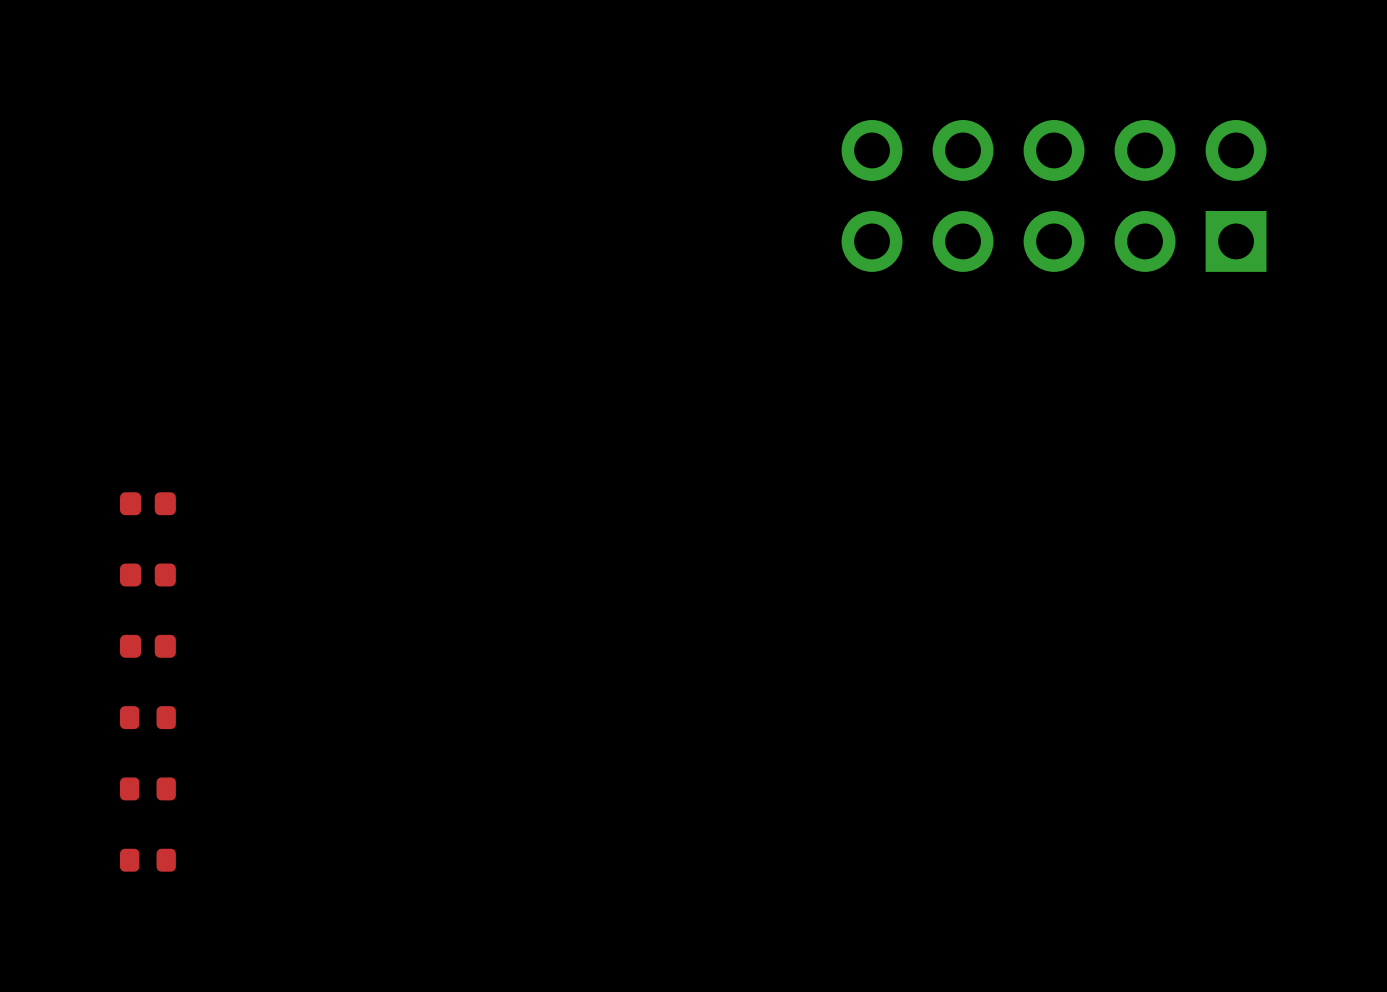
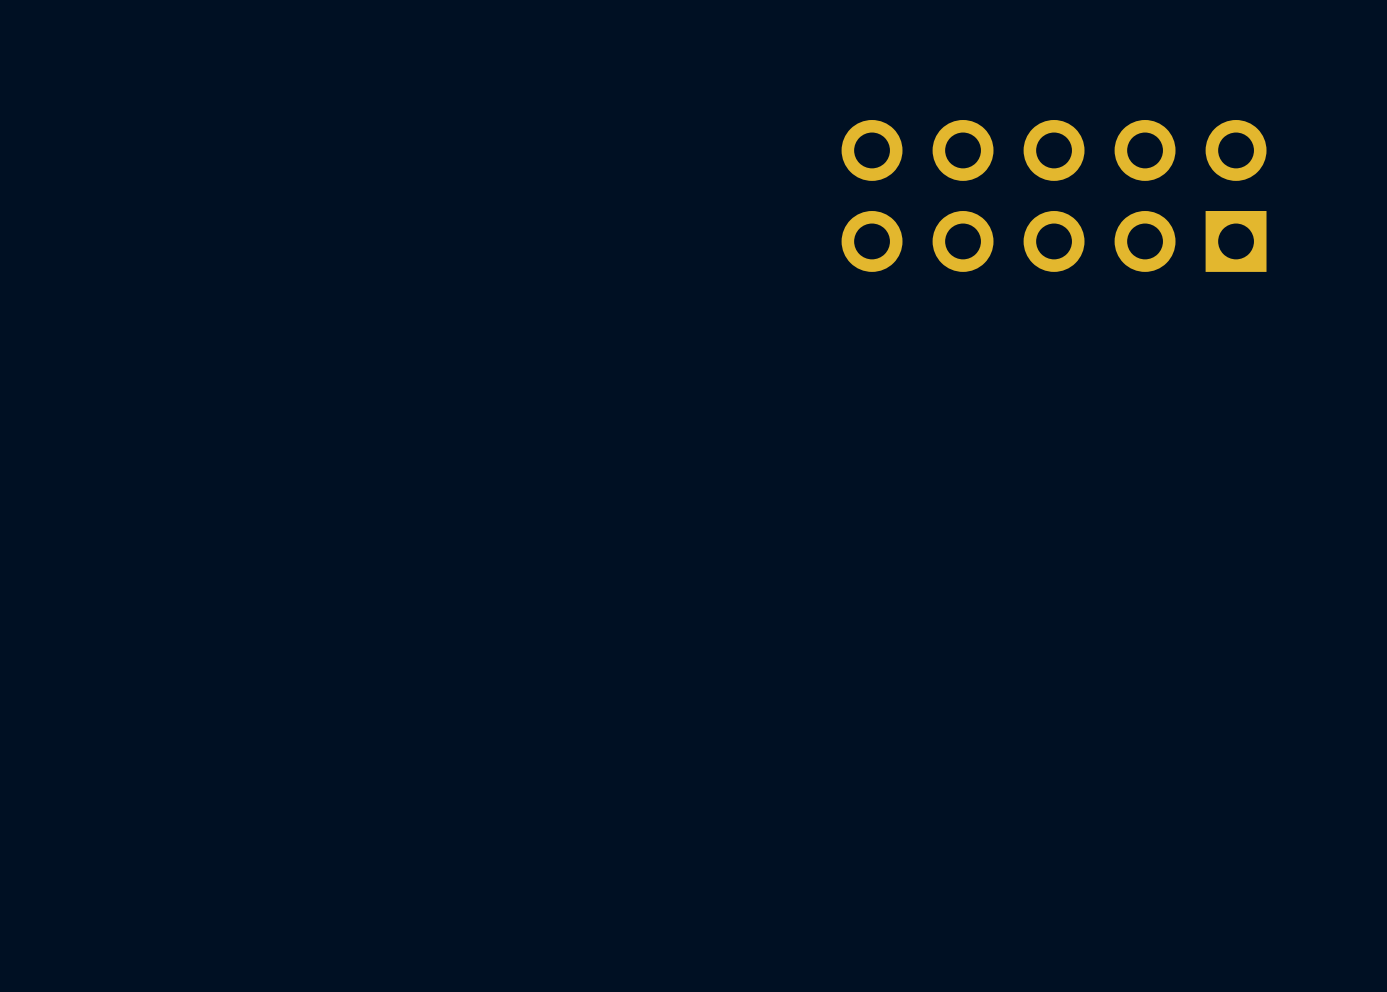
part: (147, 503) -> none
part: (147, 575) -> none
part: (147, 646) -> none
part: (147, 717) -> none
part: (147, 788) -> none
part: (147, 860) -> none

